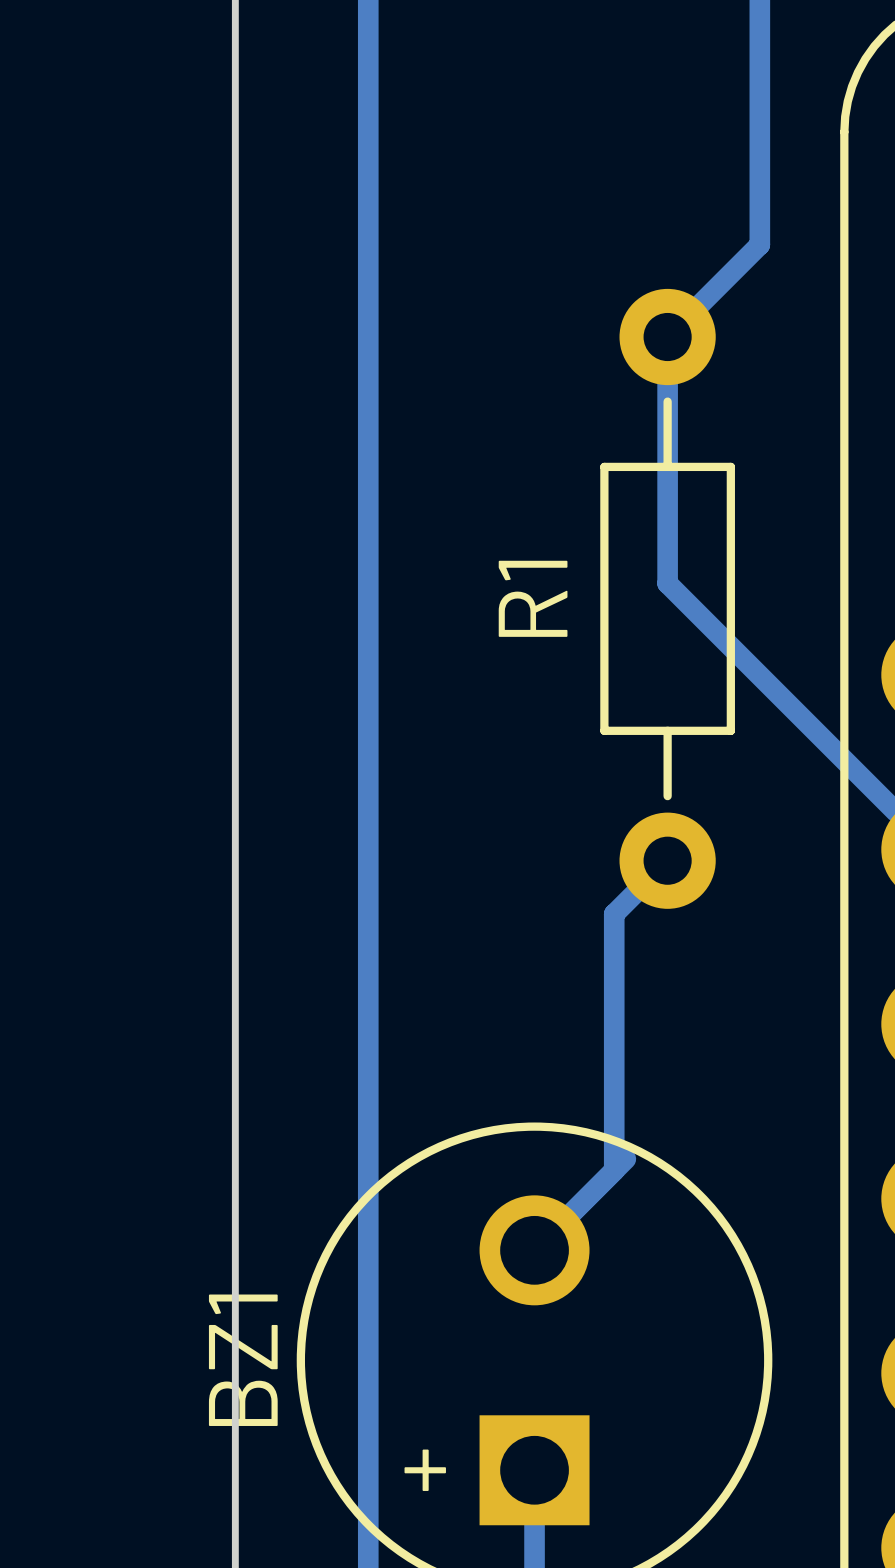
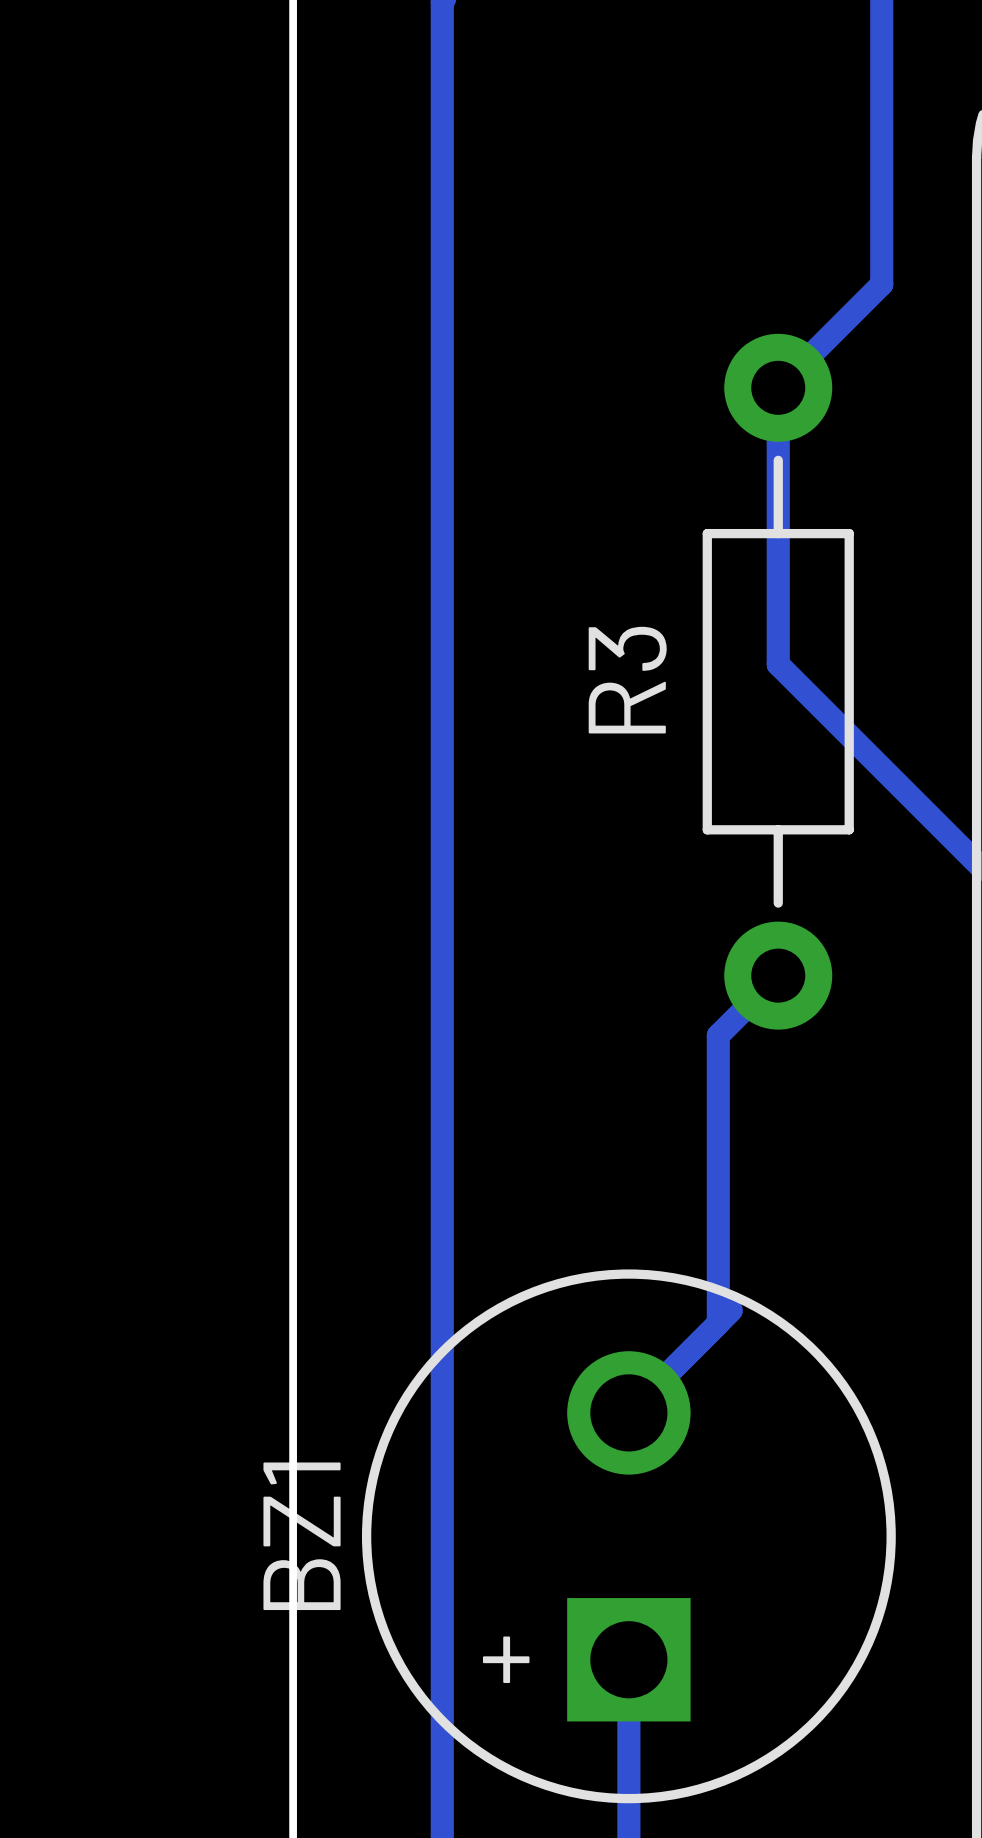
R1 name: R1 (533, 598) -> R3 (627, 680)

